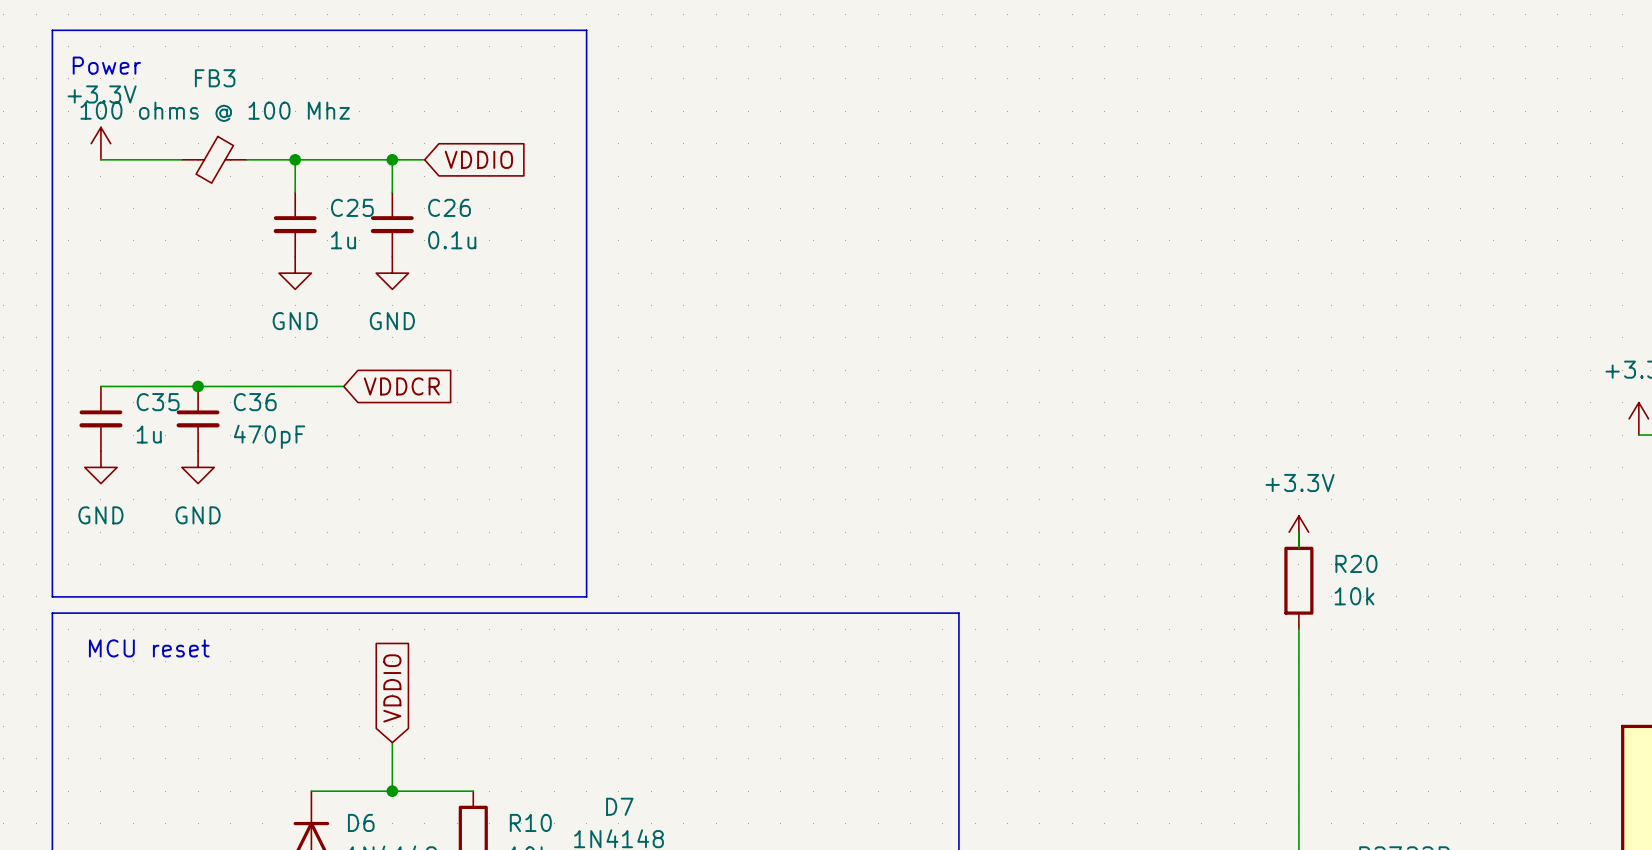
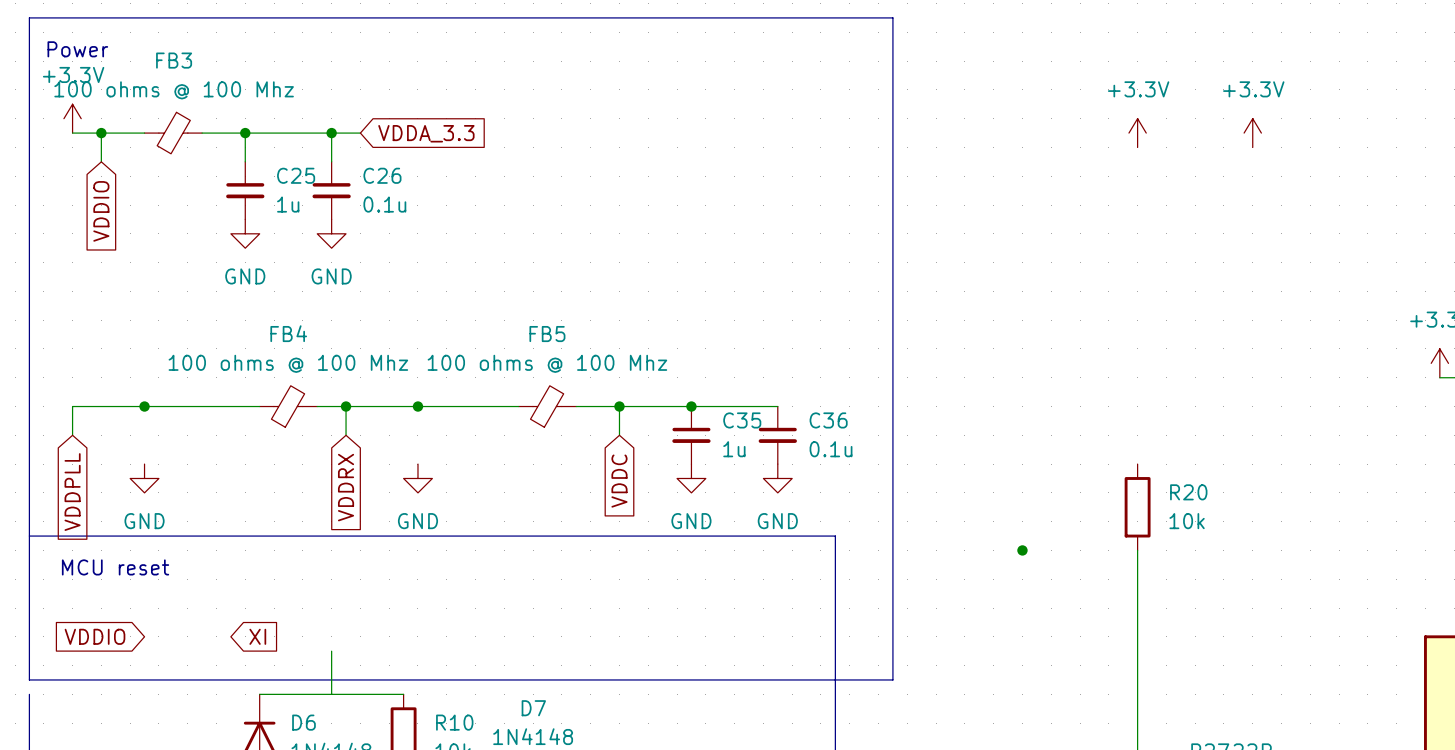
line: (586, 30) (586, 596) (52, 596) -> (504, 17) (892, 17) (892, 679) (29, 679)
wire: none -> (101, 133) (101, 161)
junction: none -> (101, 133)
global label: VDDIO (478, 159) -> VDDA_3.3 (426, 133)
power symbol: none -> +3.3V (1137, 133)
power symbol: none -> +3.3V (1252, 133)
global label: none -> VDDIO (101, 211)
wire: (100, 386) (343, 386) -> none
junction: (198, 386) -> none
global label: VDDCR (401, 386) -> none
C35 position: (100, 418) -> (691, 435)
C36 position: (198, 418) -> (777, 435)
C36 value: 470pF (269, 436) -> 0.1u (831, 449)
power symbol: GND (100, 467) -> none
junction: none -> (144, 406)
power symbol: GND (198, 467) -> none
wire: none -> (259, 406) (72, 406) (72, 435)
FB4: none -> 100 ohms @ 100 Mhz (288, 406)
wire: none -> (317, 406) (518, 406)
wire: none -> (346, 406) (346, 435)
junction: none -> (346, 406)
junction: none -> (417, 406)
FB5: none -> 100 ohms @ 100 Mhz (547, 406)
wire: none -> (576, 406) (777, 406)
wire: none -> (619, 406) (619, 435)
junction: none -> (619, 406)
junction: none -> (691, 406)
power symbol: +3.3V (1298, 532) -> none
power symbol: none -> GND (144, 478)
power symbol: none -> GND (417, 478)
power symbol: none -> GND (691, 478)
power symbol: none -> GND (777, 478)
global label: none -> VDDC (619, 481)
global label: none -> VDDRX (346, 487)
global label: none -> VDDPLL (72, 492)
junction: none -> (1022, 550)
global label rotation: 0° (392, 688) -> 90° counterclockwise (94, 636)
global label position: VDDIO (392, 688) -> VDDIO (94, 636)
global label: none -> XI (257, 636)
line: (52, 774) (52, 791) -> (29, 521) (29, 536)
junction: (392, 791) -> none

